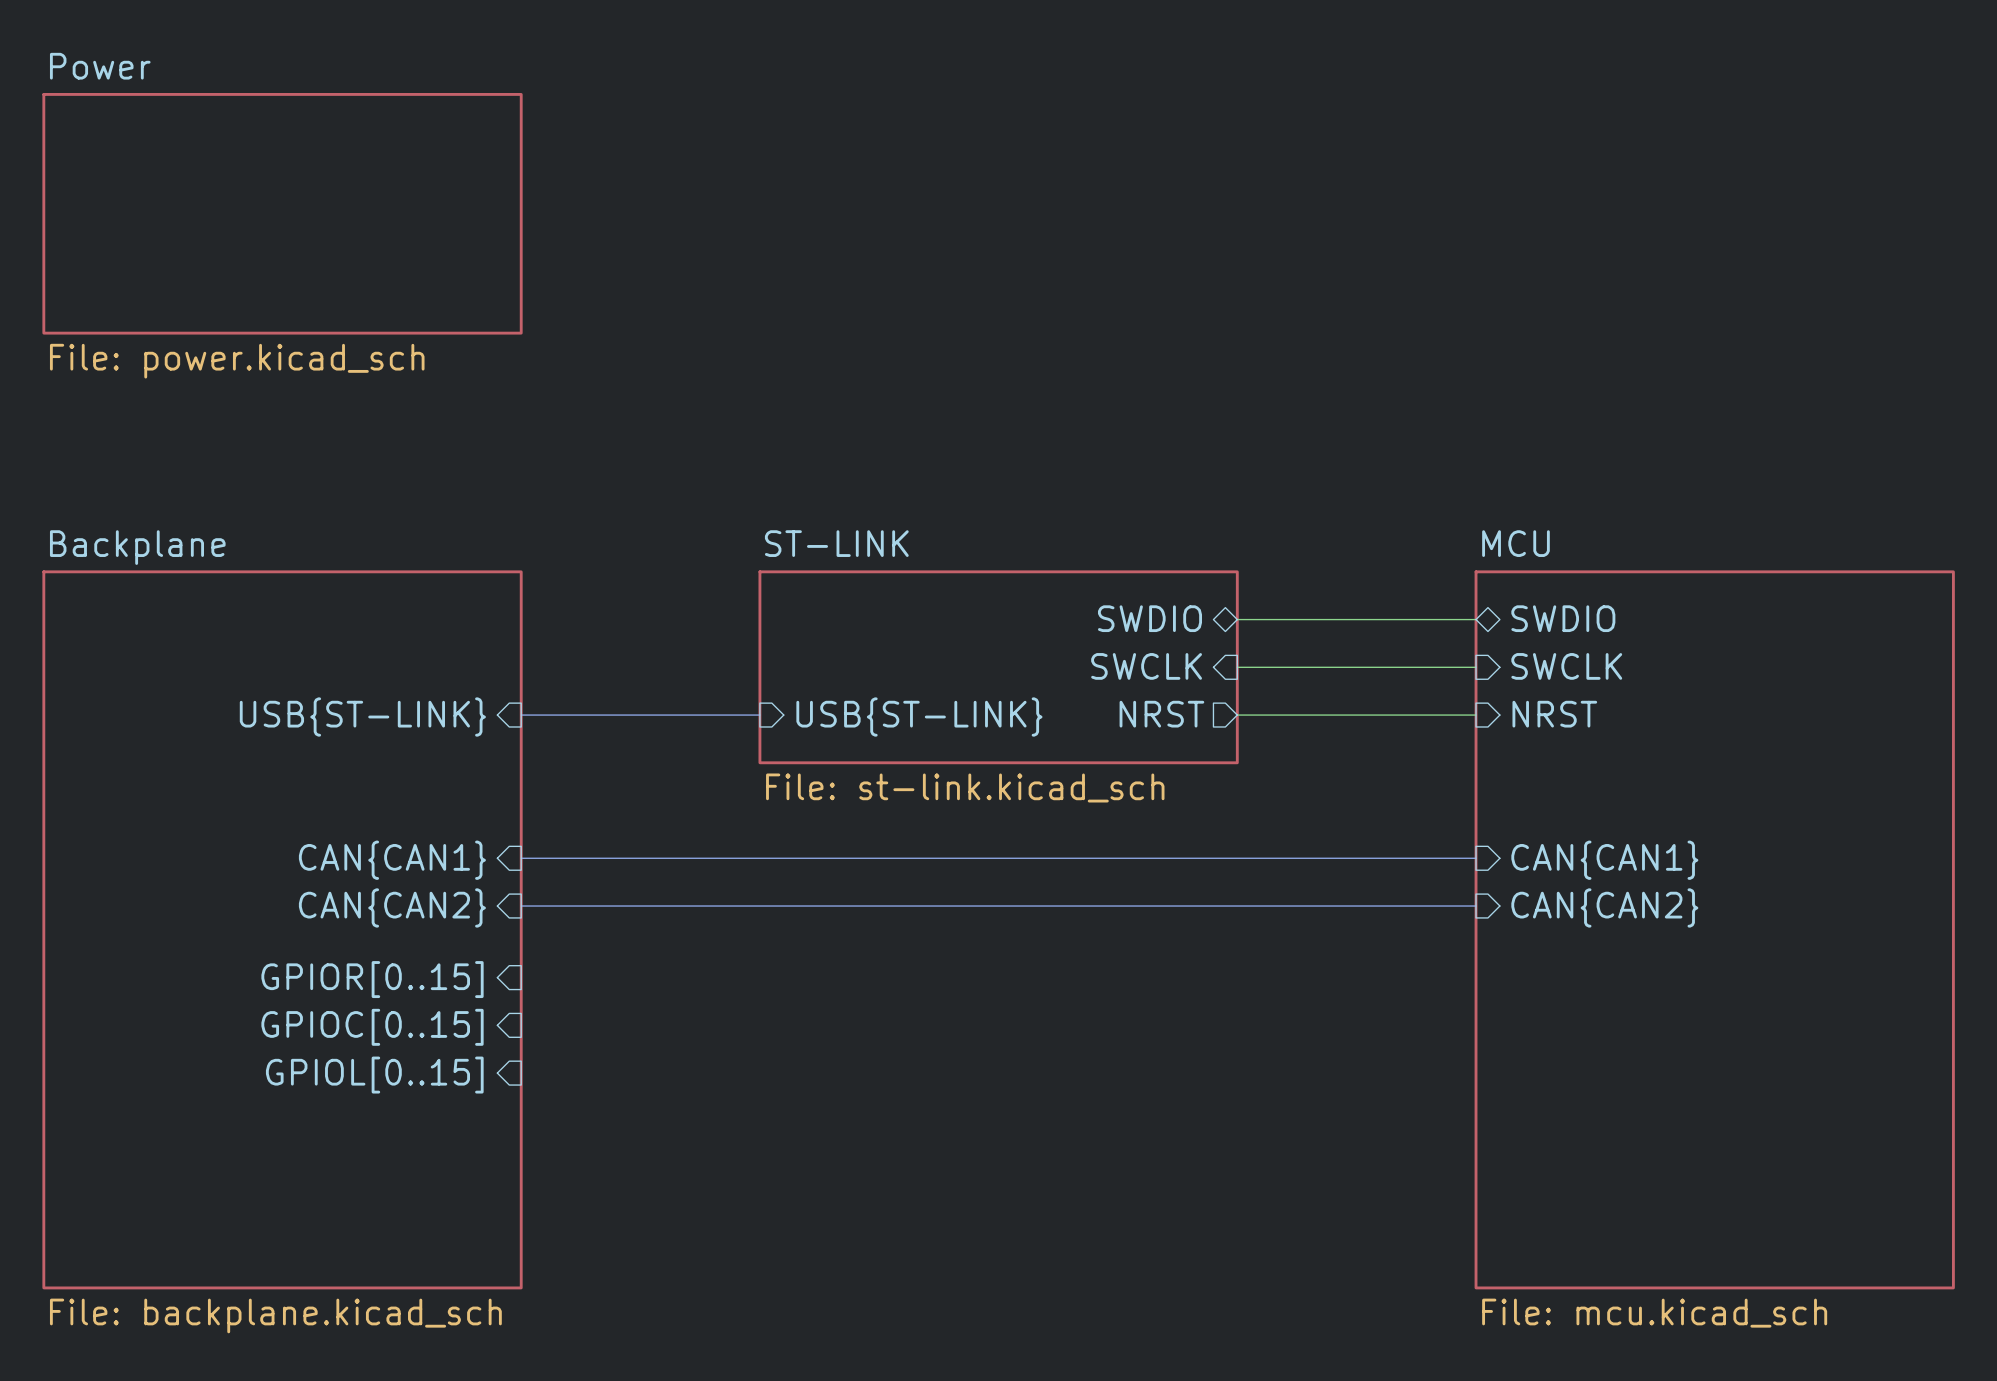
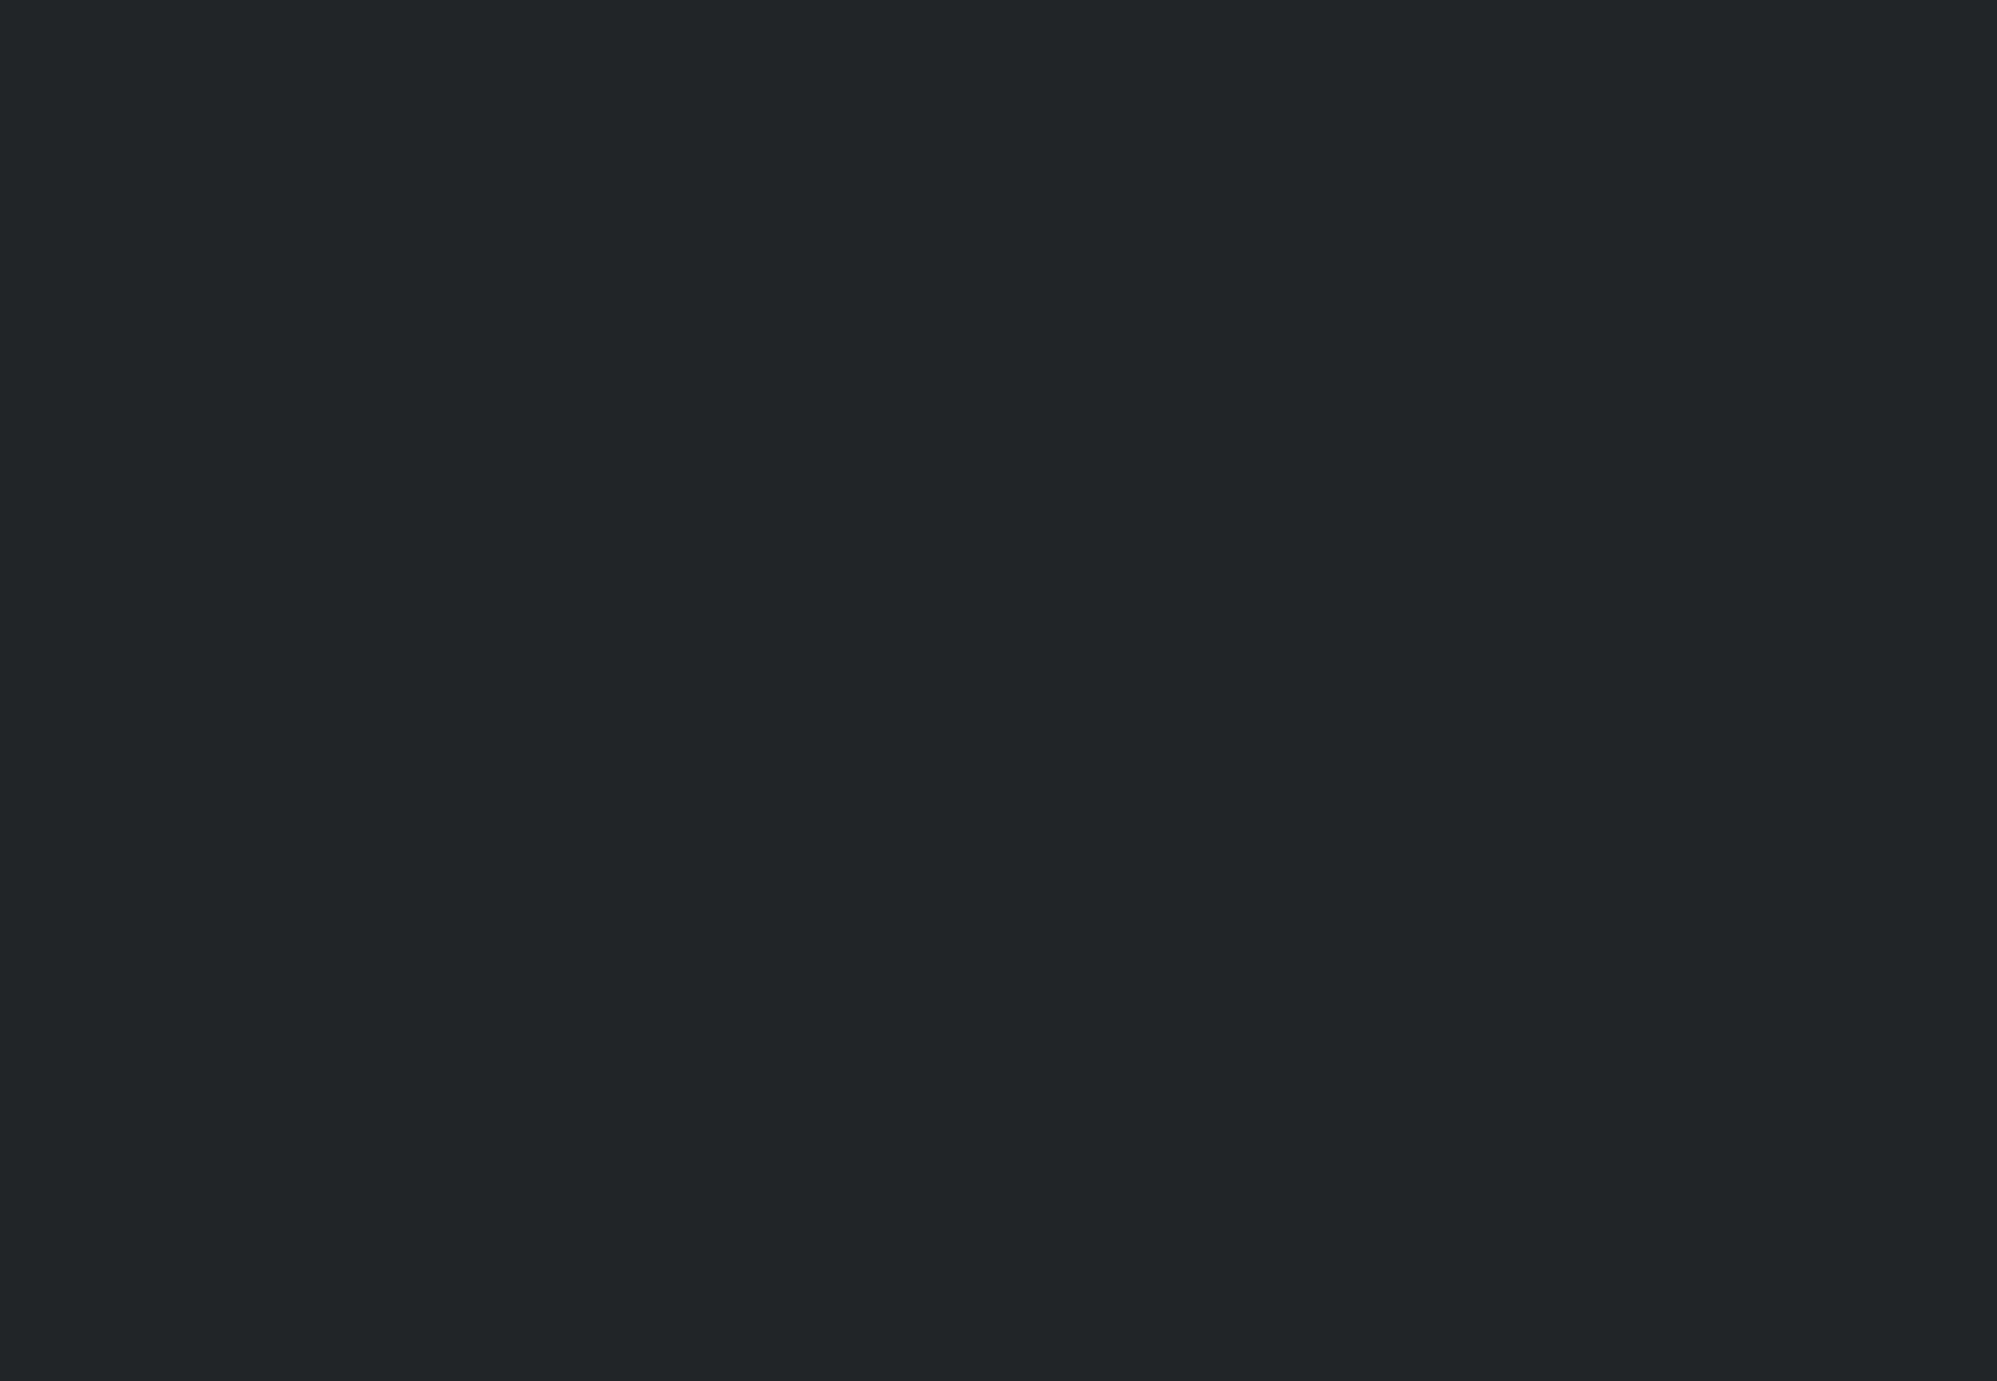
sheet Power: File: power.kicad_sch (282, 213) -> none
sheet pin: SWDIO (1149, 618) -> none
sheet pin: SWDIO (1563, 618) -> none
wire: (1237, 619) (1476, 619) -> none
sheet pin: SWCLK (1146, 666) -> none
sheet pin: SWCLK (1566, 666) -> none
sheet ST-LINK: File: st-link.kicad_sch (998, 667) -> none
wire: (1237, 667) (1476, 667) -> none
sheet pin: NRST (1161, 714) -> none
sheet pin: NRST (1554, 714) -> none
bus: (521, 715) (759, 715) -> none
wire: (1237, 715) (1476, 715) -> none
sheet pin: USB{ST-LINK} (362, 717) -> none
sheet pin: USB{ST-LINK} (919, 717) -> none
bus: (521, 858) (1476, 858) -> none
sheet pin: CAN{CAN1} (392, 860) -> none
sheet pin: CAN{CAN1} (1604, 860) -> none
bus: (521, 906) (1476, 906) -> none
sheet pin: CAN{CAN2} (392, 907) -> none
sheet pin: CAN{CAN2} (1604, 907) -> none
sheet Backplane: File: backplane.kicad_sch (282, 929) -> none
sheet MCU: File: mcu.kicad_sch (1714, 929) -> none
sheet pin: GPIOR[0..15] (372, 979) -> none
sheet pin: GPIOC[0..15] (372, 1027) -> none
sheet pin: GPIOL[0..15] (374, 1075) -> none

